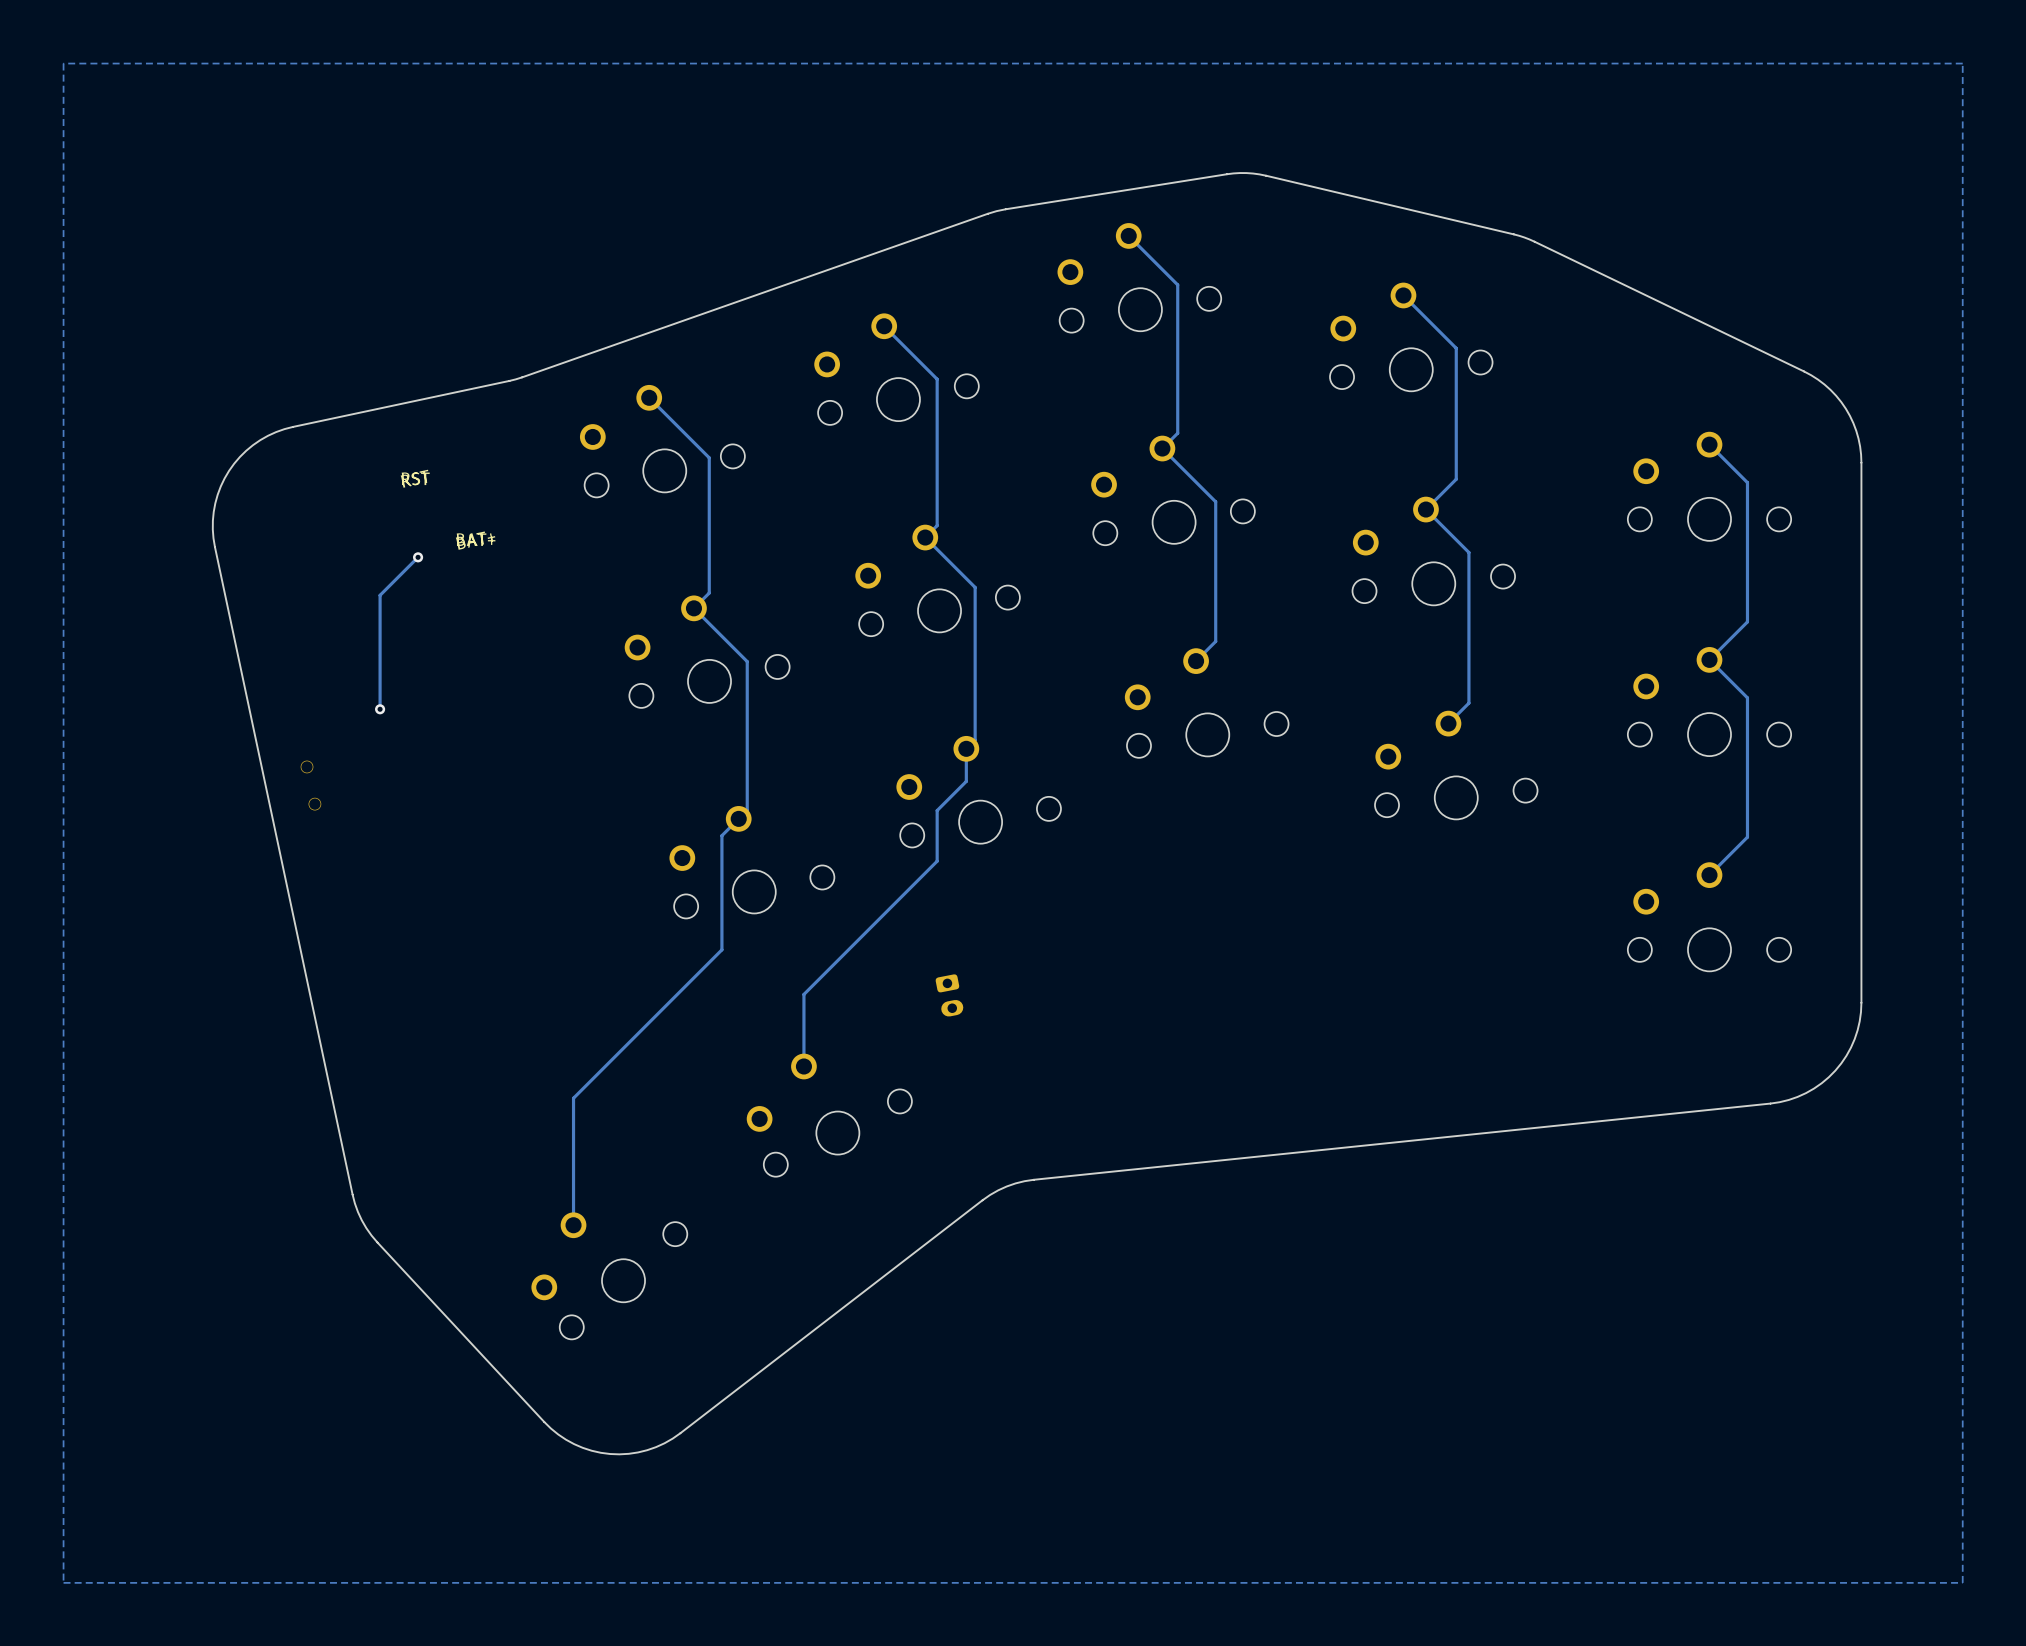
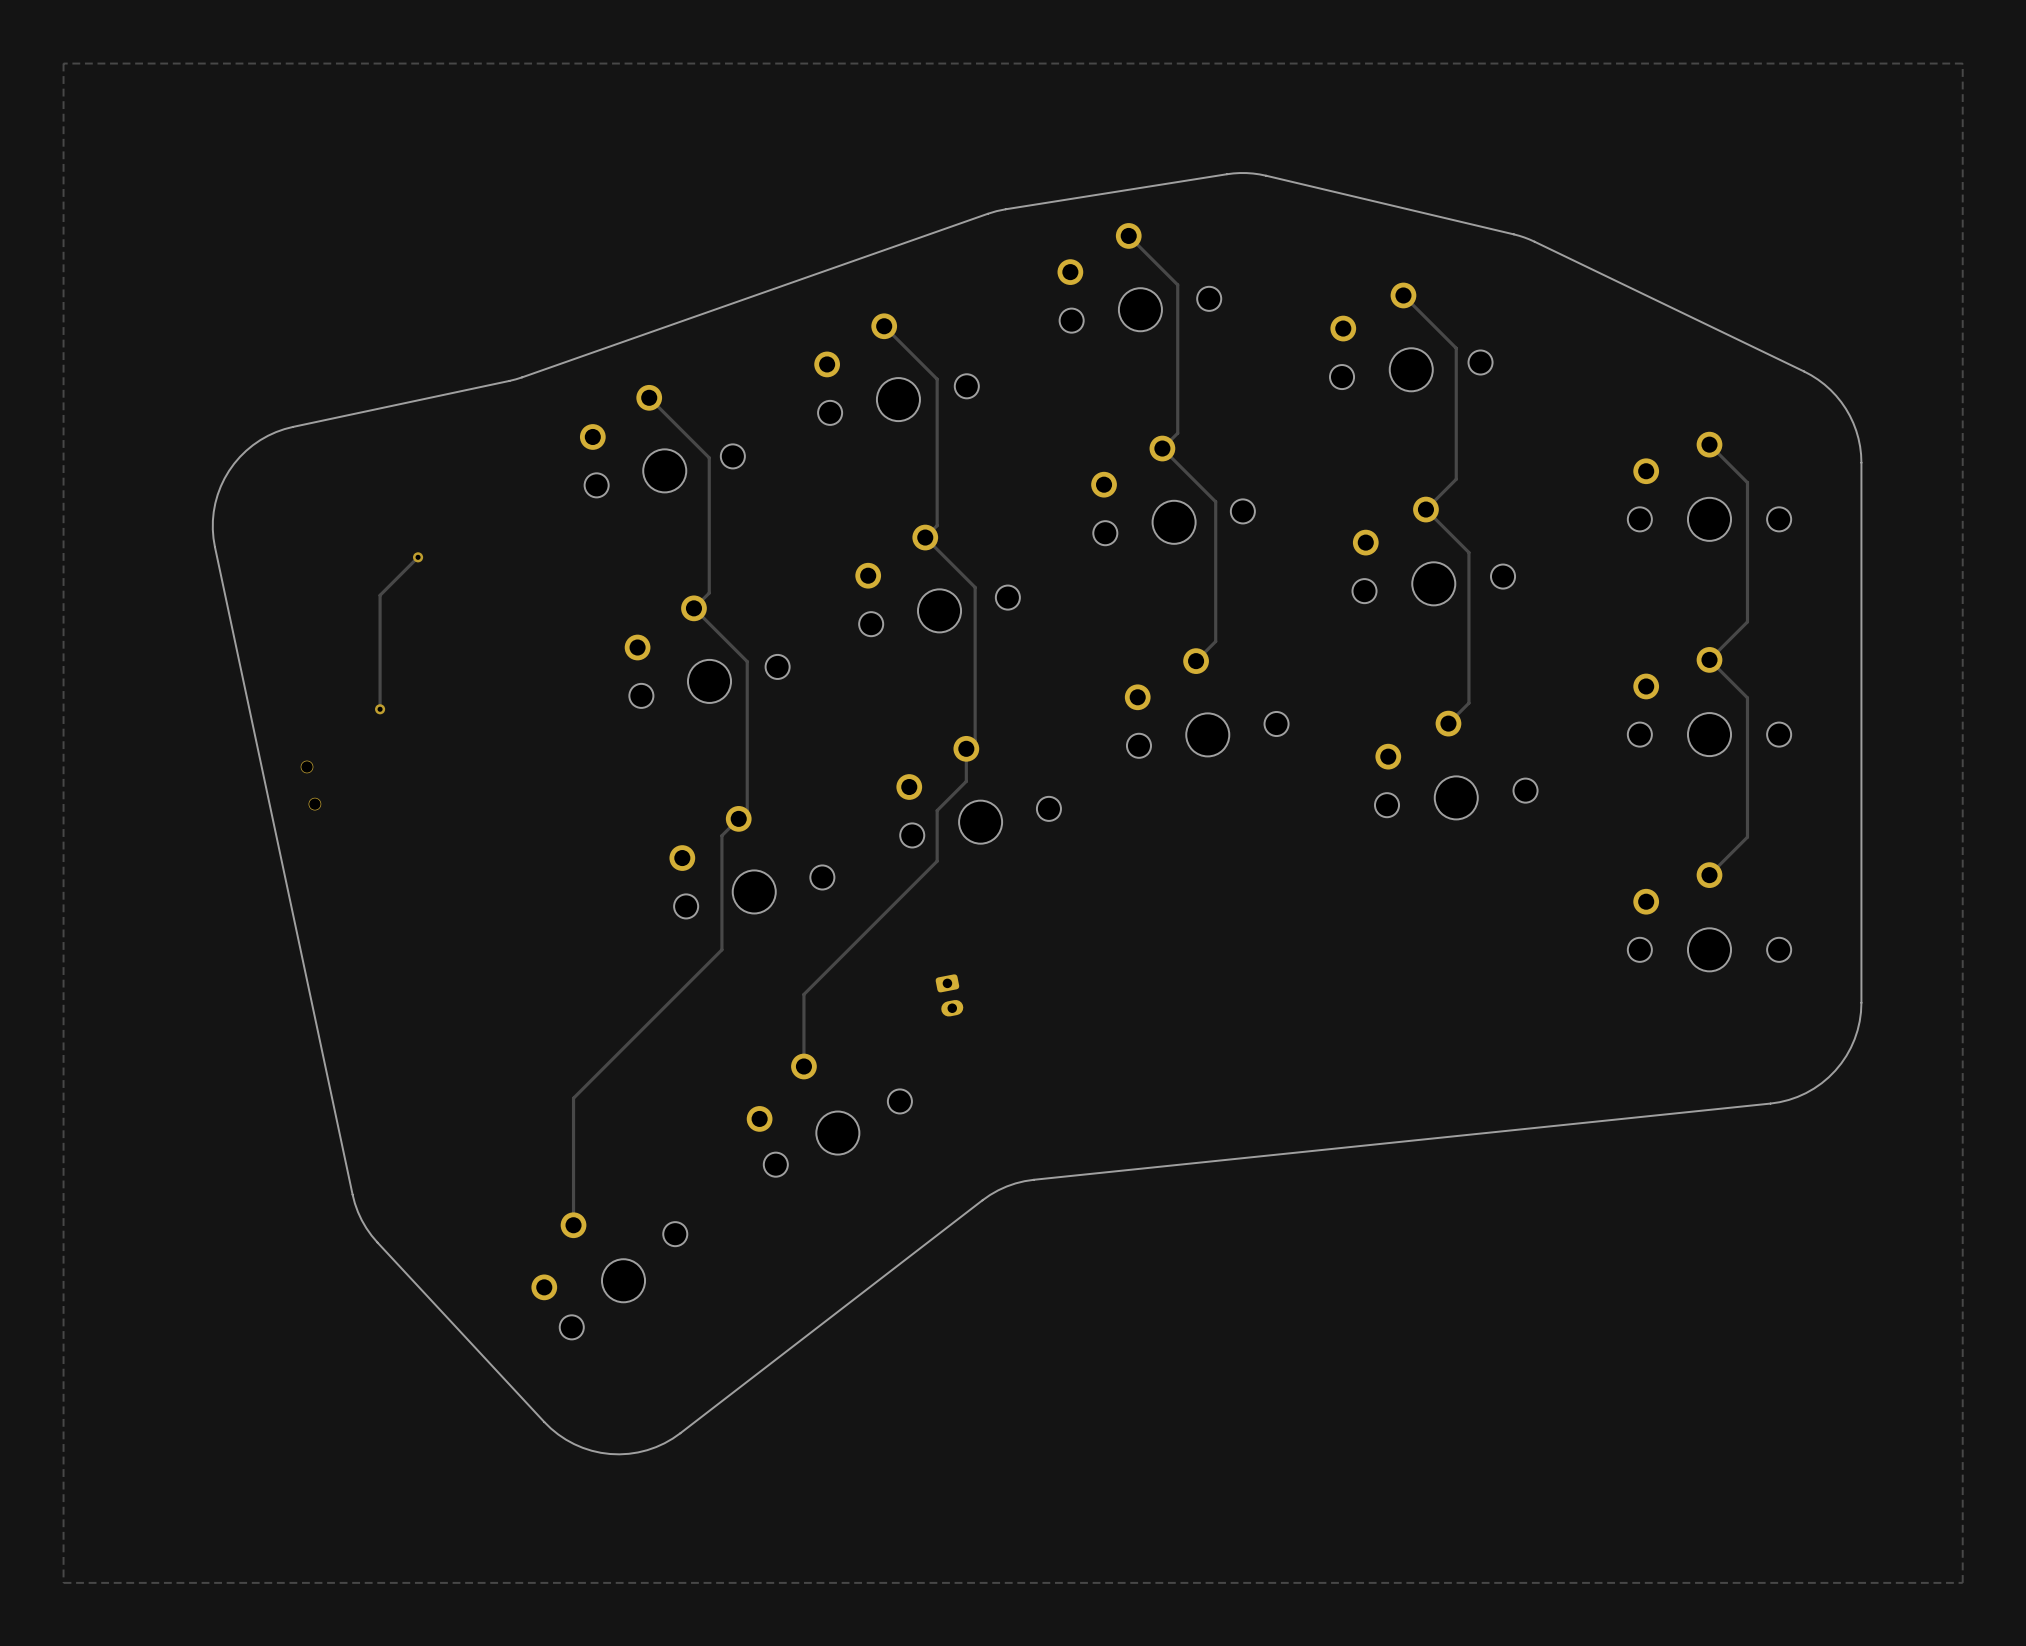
part: (448, 509) -> none

